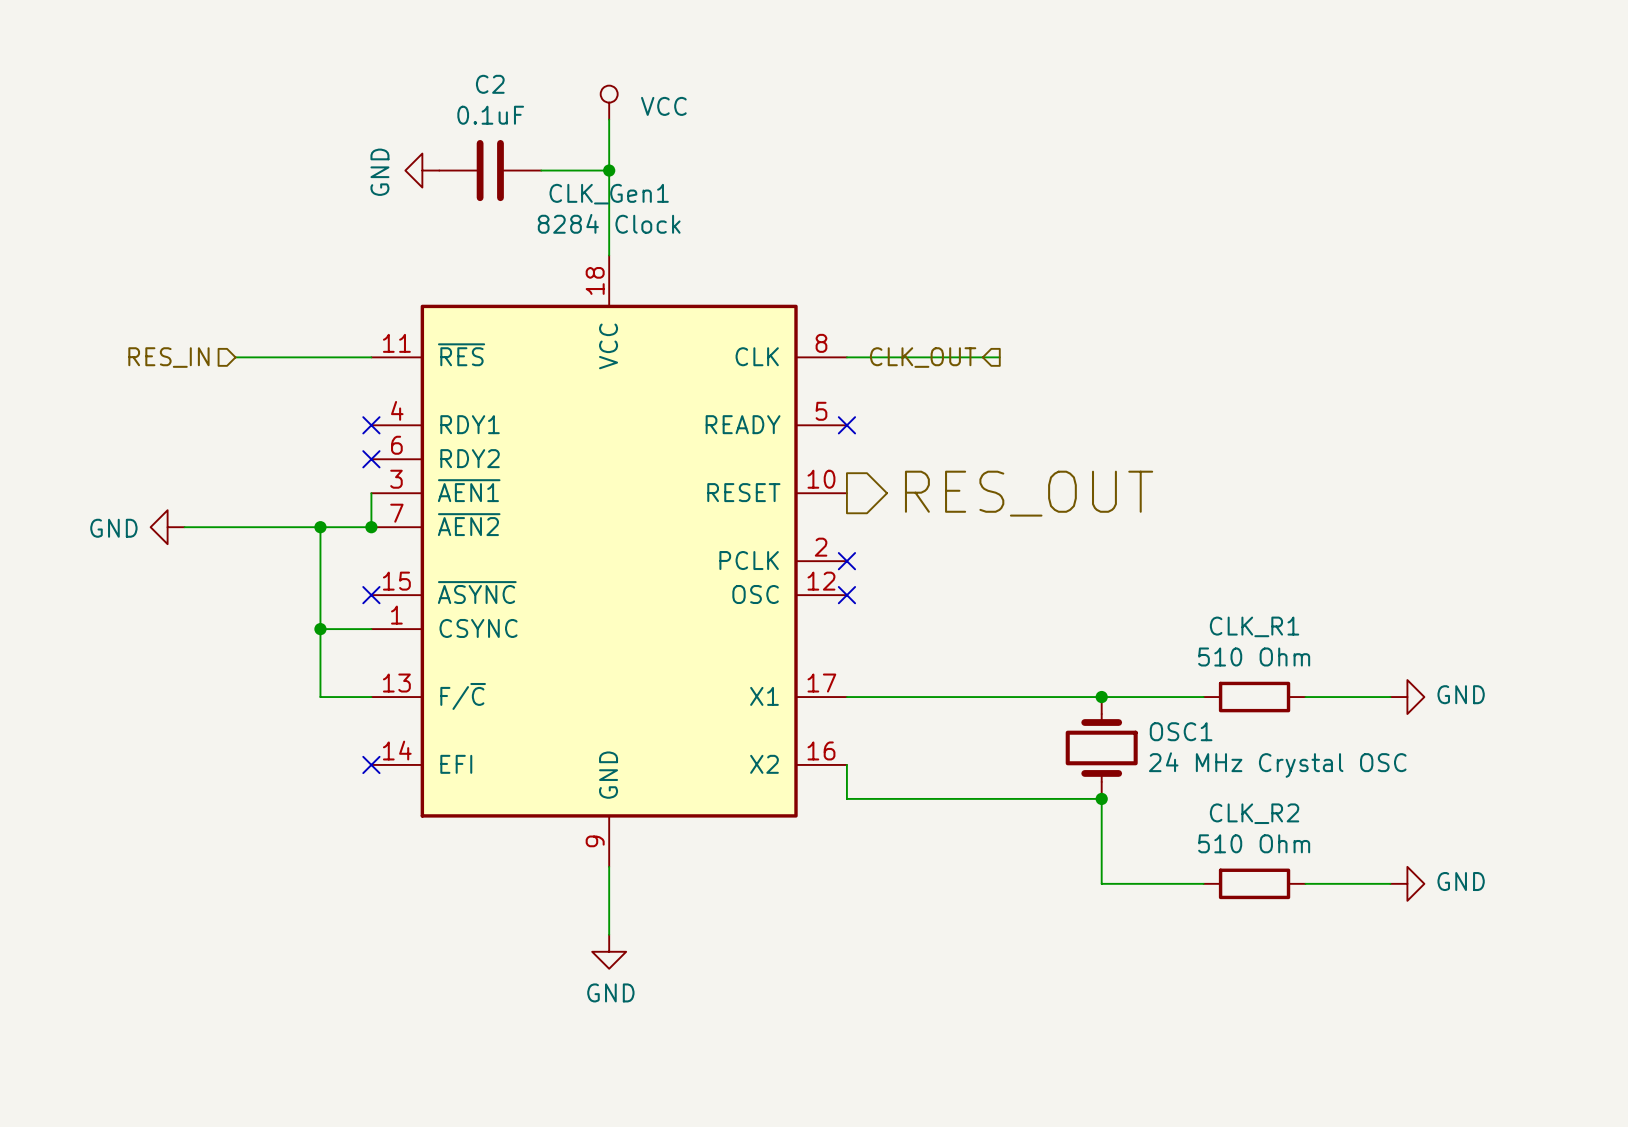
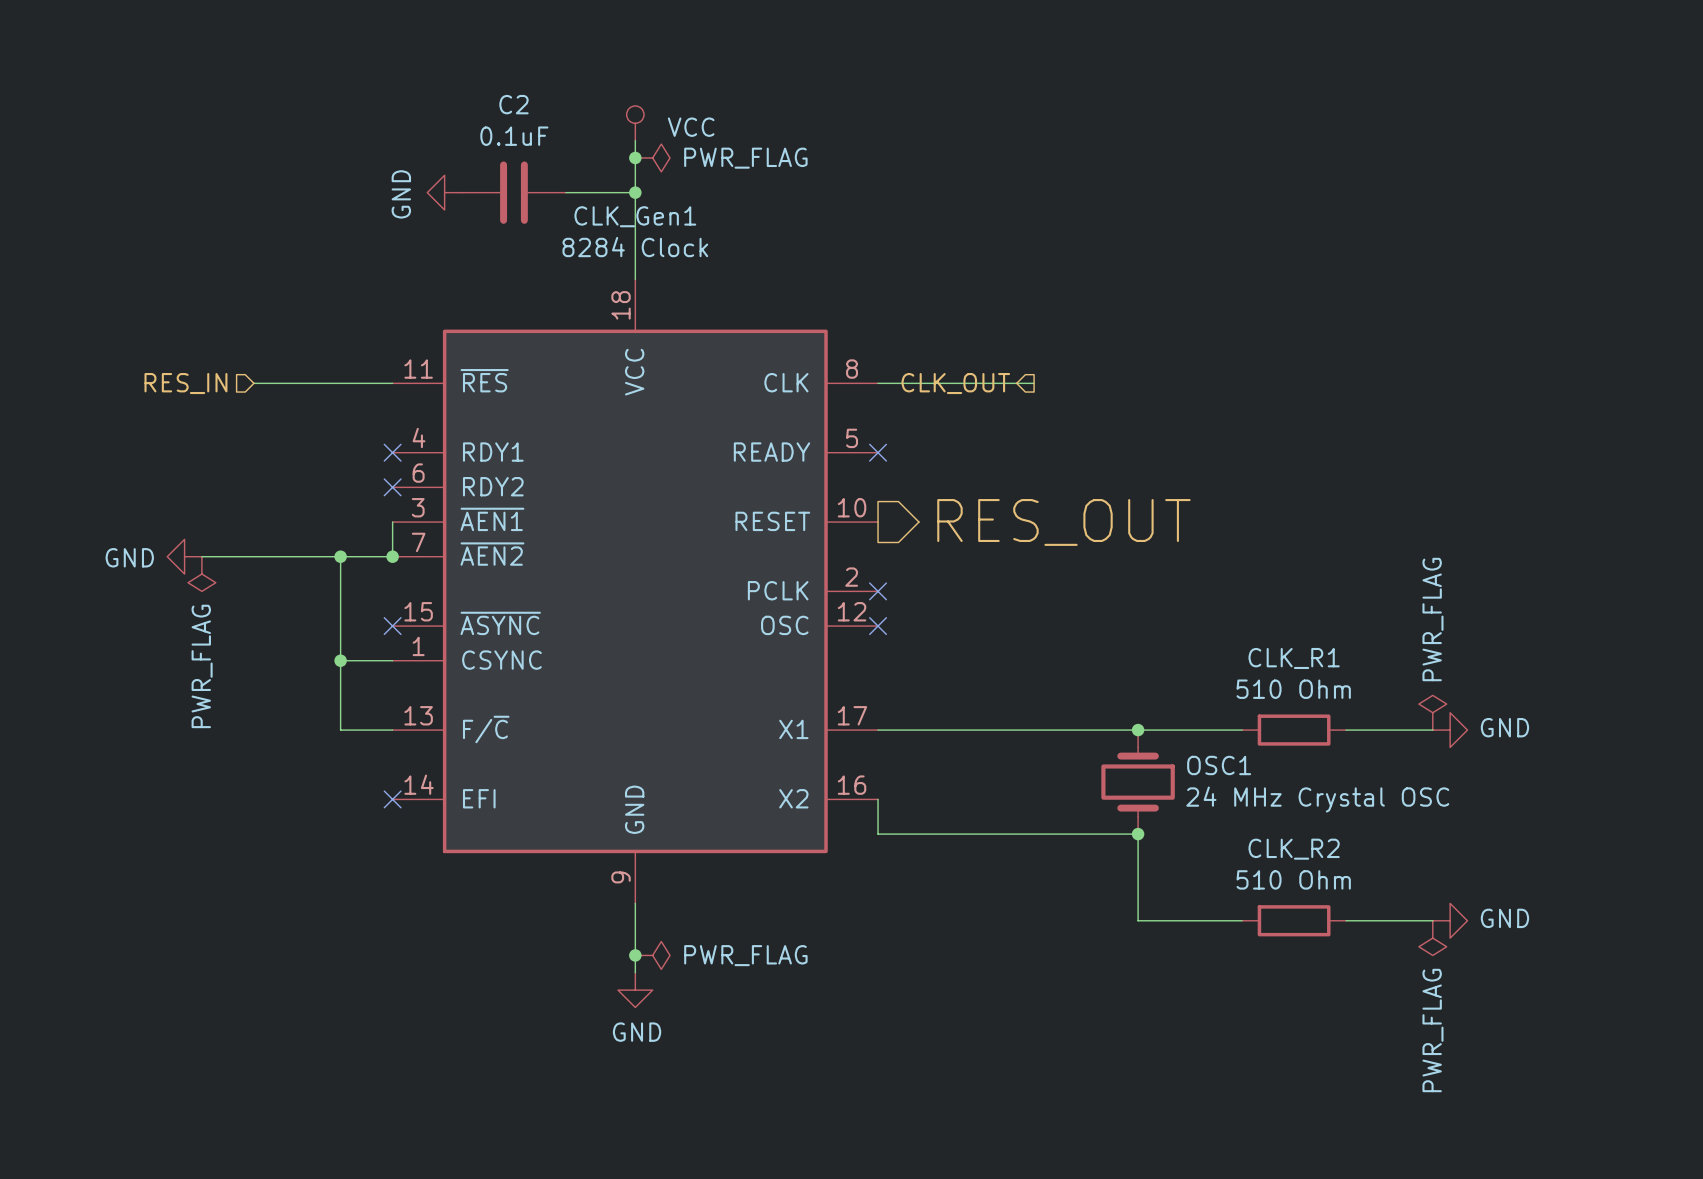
junction: none -> (635, 157)
power symbol: none -> PWR_FLAG (652, 157)
power symbol: none -> PWR_FLAG (201, 574)
power symbol: none -> PWR_FLAG (1432, 712)
power symbol: none -> PWR_FLAG (1432, 938)
junction: none -> (635, 955)
power symbol: none -> PWR_FLAG (652, 955)

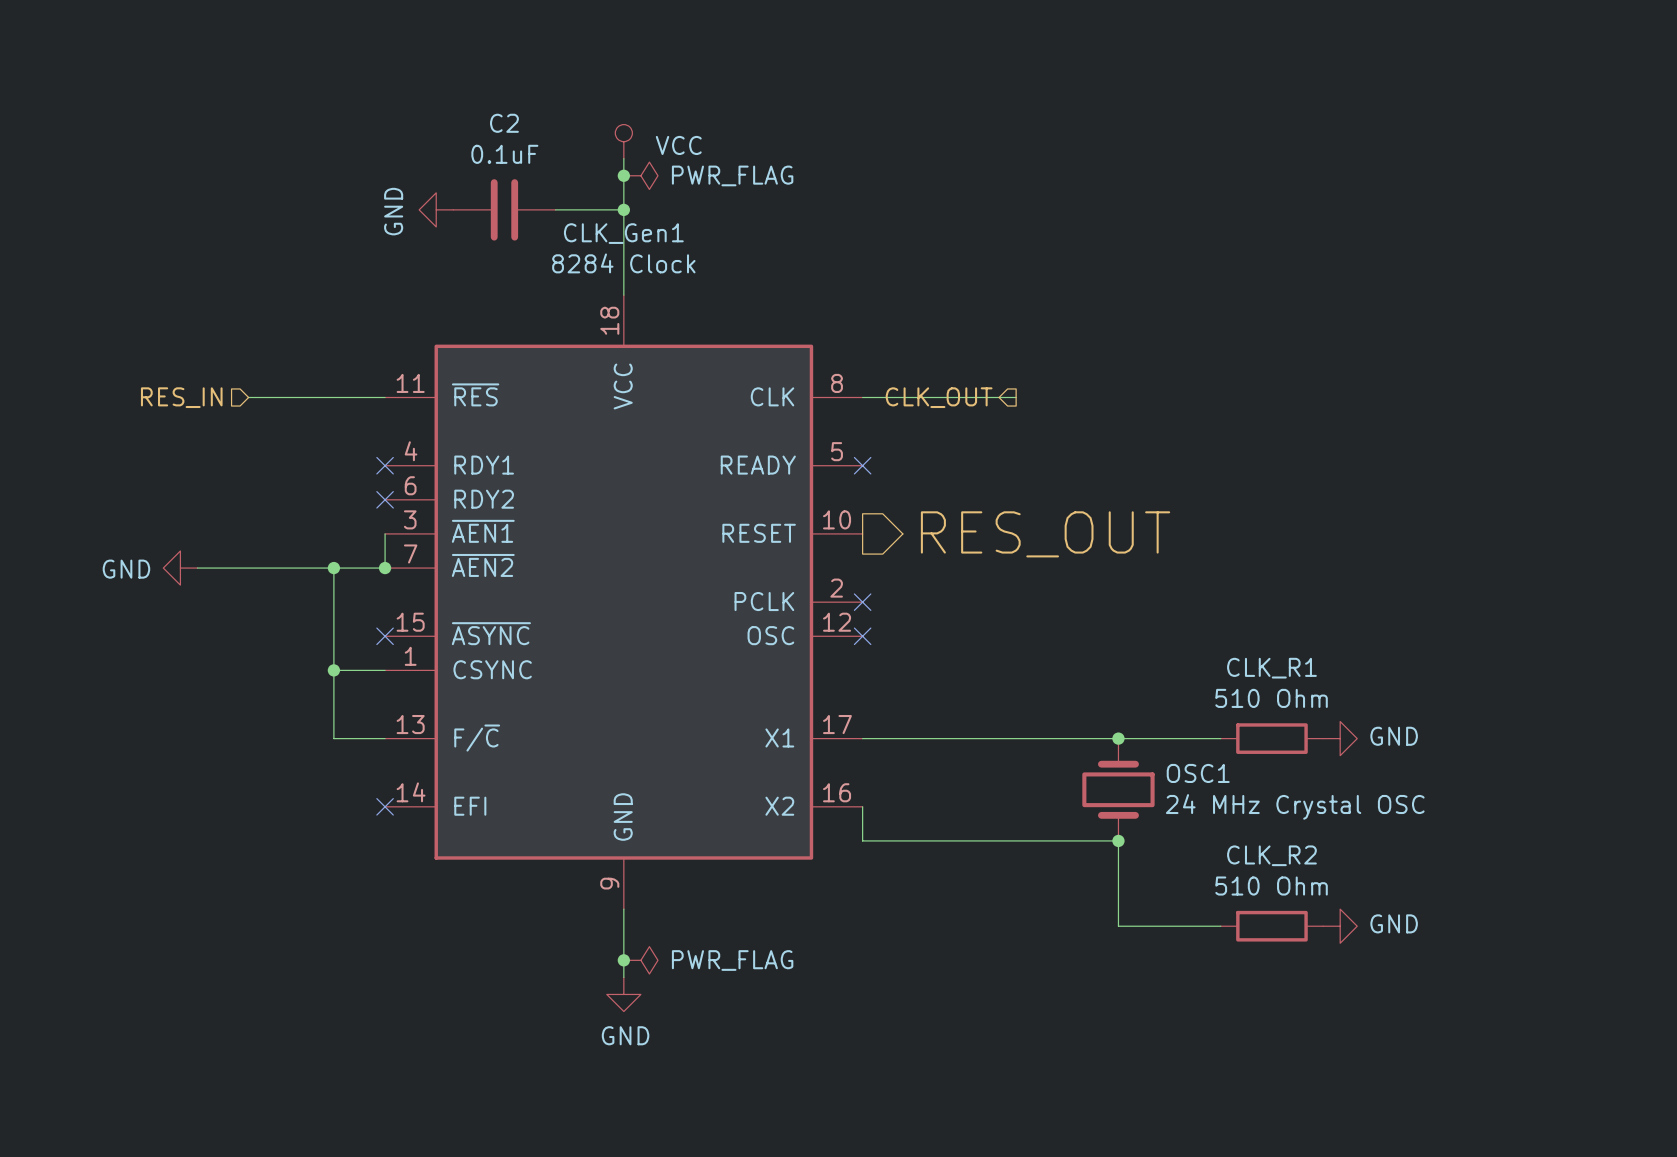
power symbol: PWR_FLAG (201, 574) -> none
power symbol: PWR_FLAG (1432, 712) -> none
wire: (1346, 730) (1432, 730) -> none
power symbol position: GND (1450, 730) -> GND (1340, 738)
wire: (1346, 920) (1432, 920) -> none
power symbol position: GND (1450, 920) -> GND (1340, 926)
power symbol: PWR_FLAG (1432, 938) -> none

